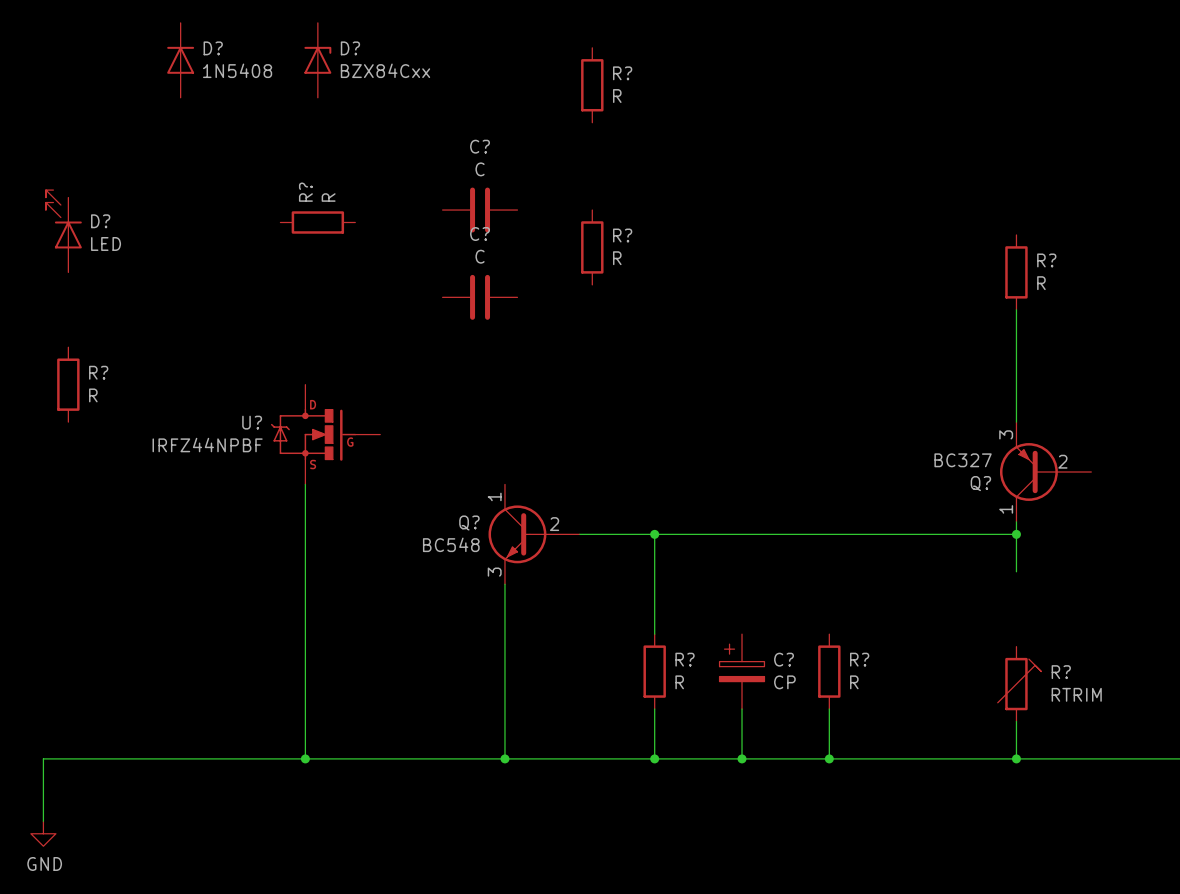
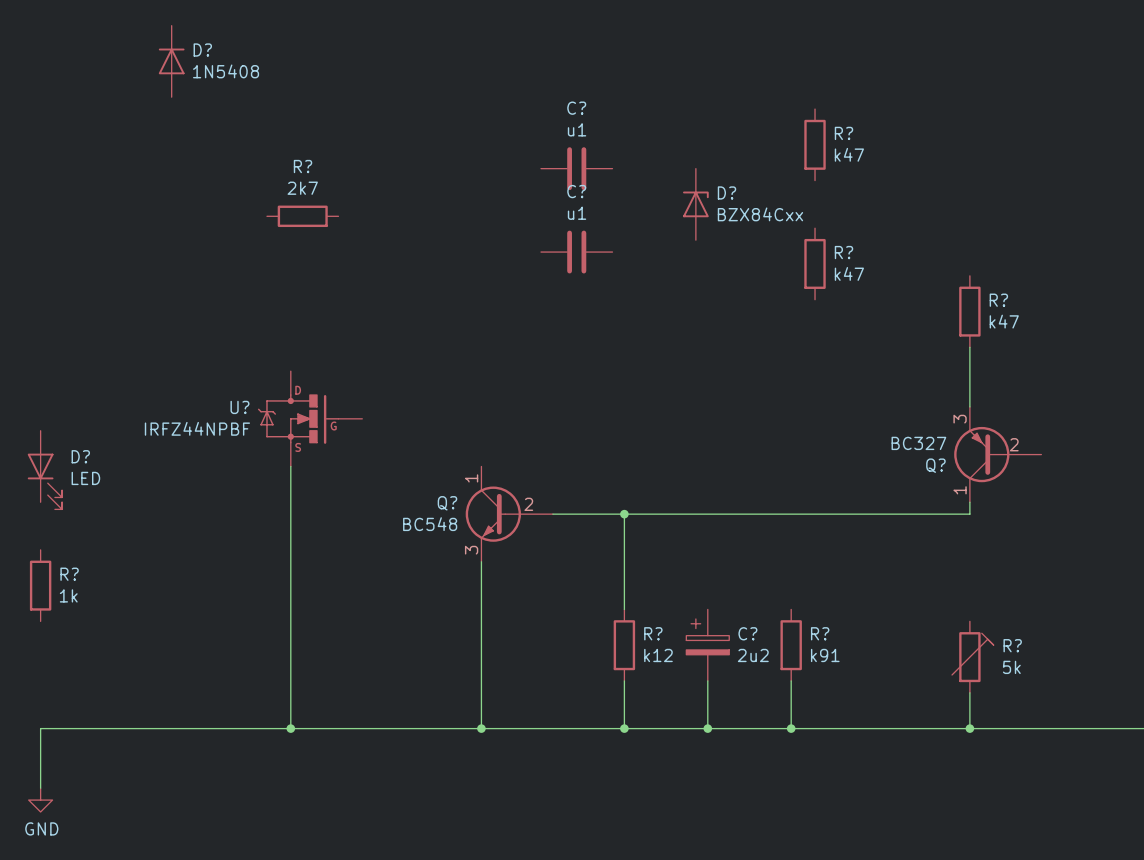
D?: BZX84Cxx (317, 60) -> none
R?: R (592, 85) -> none
R?: none -> k47 (815, 144)
C?: none -> u1 (576, 168)
R? name rotation: 0° (305, 192) -> 90° clockwise (303, 166)
R? value: R (328, 197) -> 2k7 (302, 188)
C?: C (480, 210) -> none
D?: none -> BZX84Cxx (695, 204)
D?: LED (63, 231) -> none
R?: R (592, 247) -> none
C?: none -> u1 (576, 252)
R?: none -> k47 (815, 263)
R?: R (1016, 272) -> none
C?: C (480, 297) -> none
wire: (1016, 309) (1016, 359) -> none
R?: none -> k47 (969, 311)
R?: R (68, 384) -> none
D?: none -> LED (44, 470)
wire: (1016, 534) (1016, 571) -> none
junction: (1016, 534) -> none
R?: none -> 1k (40, 585)
R? value: R (679, 682) -> k12 (658, 655)
C? value: CP (784, 682) -> 2u2 (753, 655)
R? value: R (854, 682) -> k91 (825, 655)
R? value: RTRIM (1076, 694) -> 5k (1011, 667)

